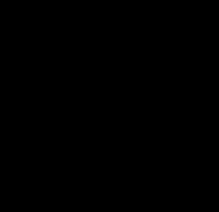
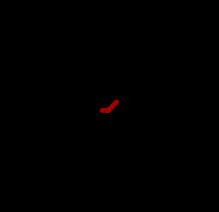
top track: none -> (116, 102) (108, 110) (102, 110)

